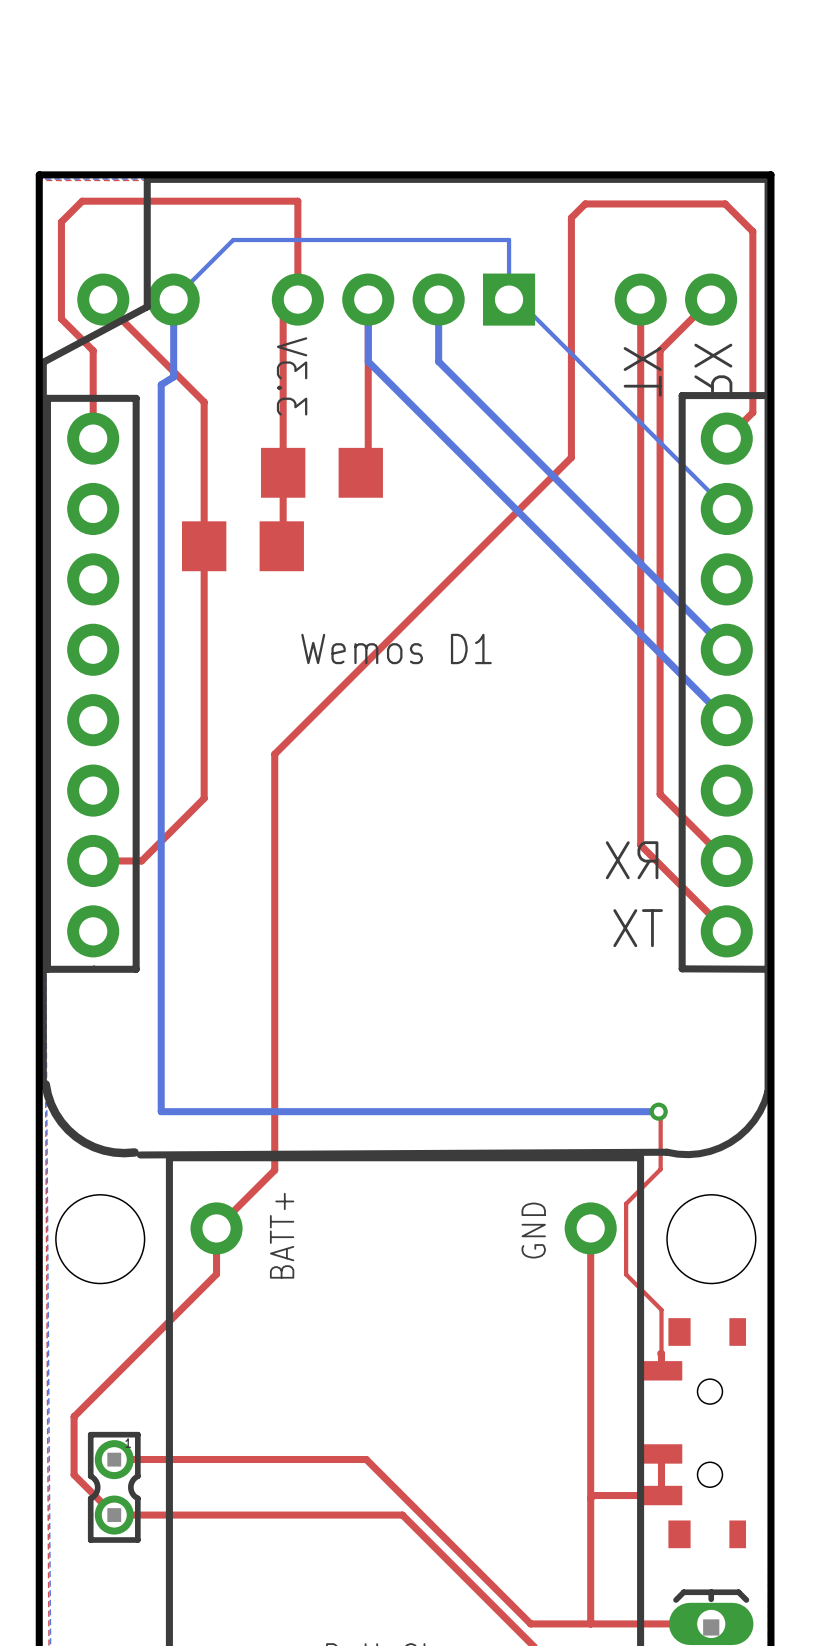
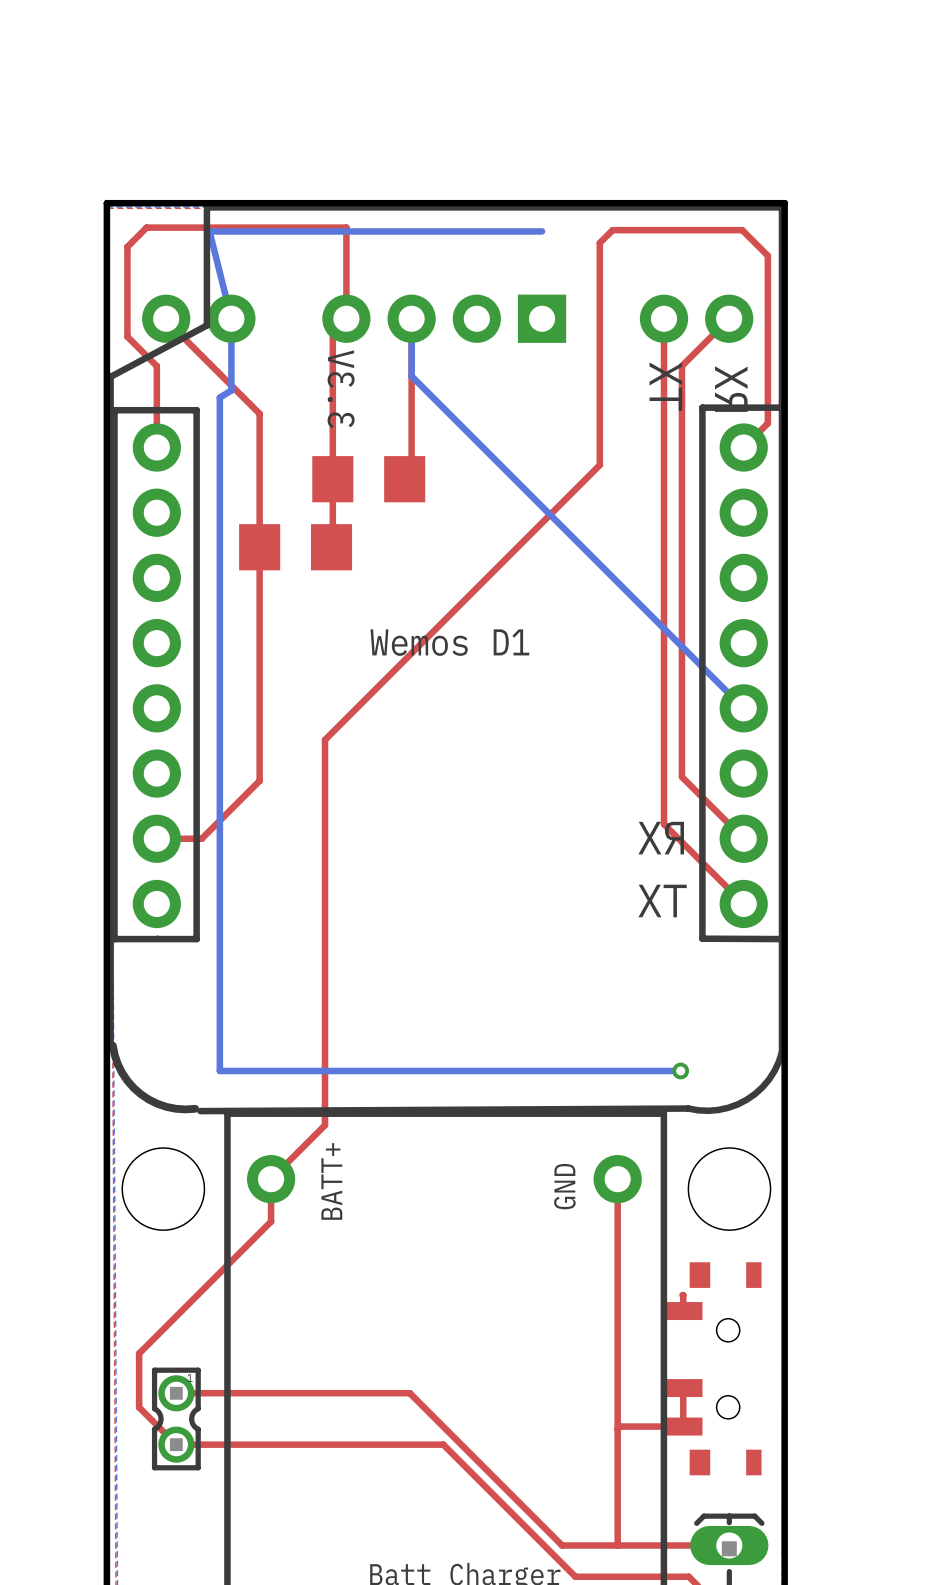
bottom track: (173, 299) (233, 240) (509, 240) (509, 299) (517, 299) (726, 508) -> (231, 318) (209, 231) (542, 231)
bottom track: (438, 299) (438, 361) (726, 649) -> none
top track: (660, 1113) (660, 1169) (626, 1203) (626, 1274) (661, 1309) (661, 1370) -> none

